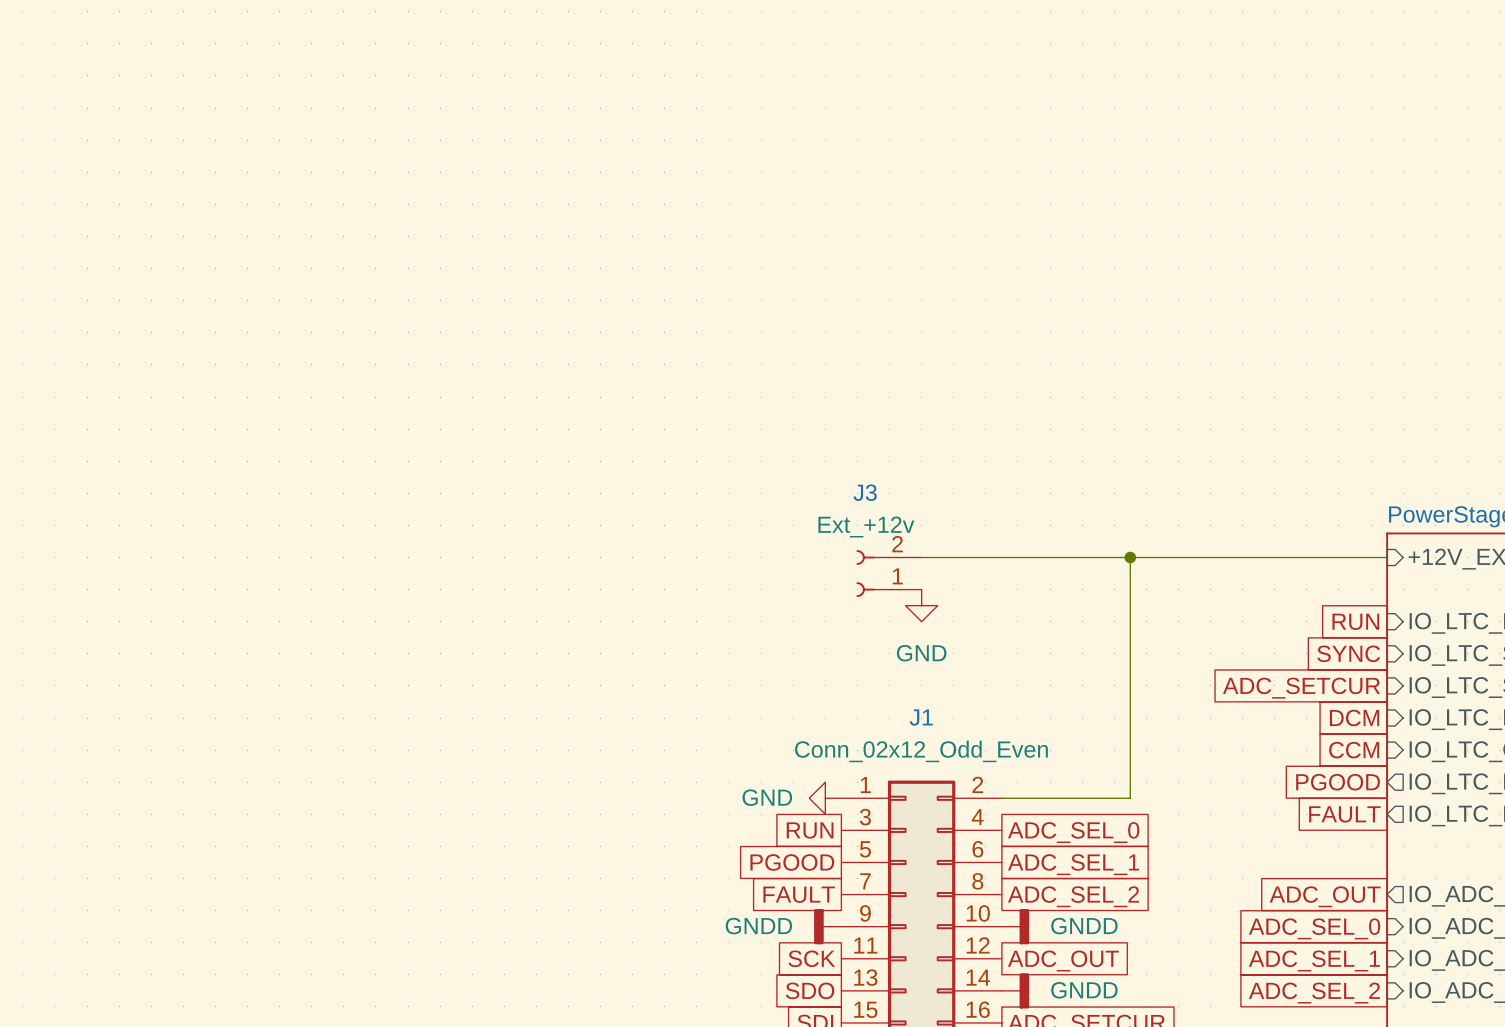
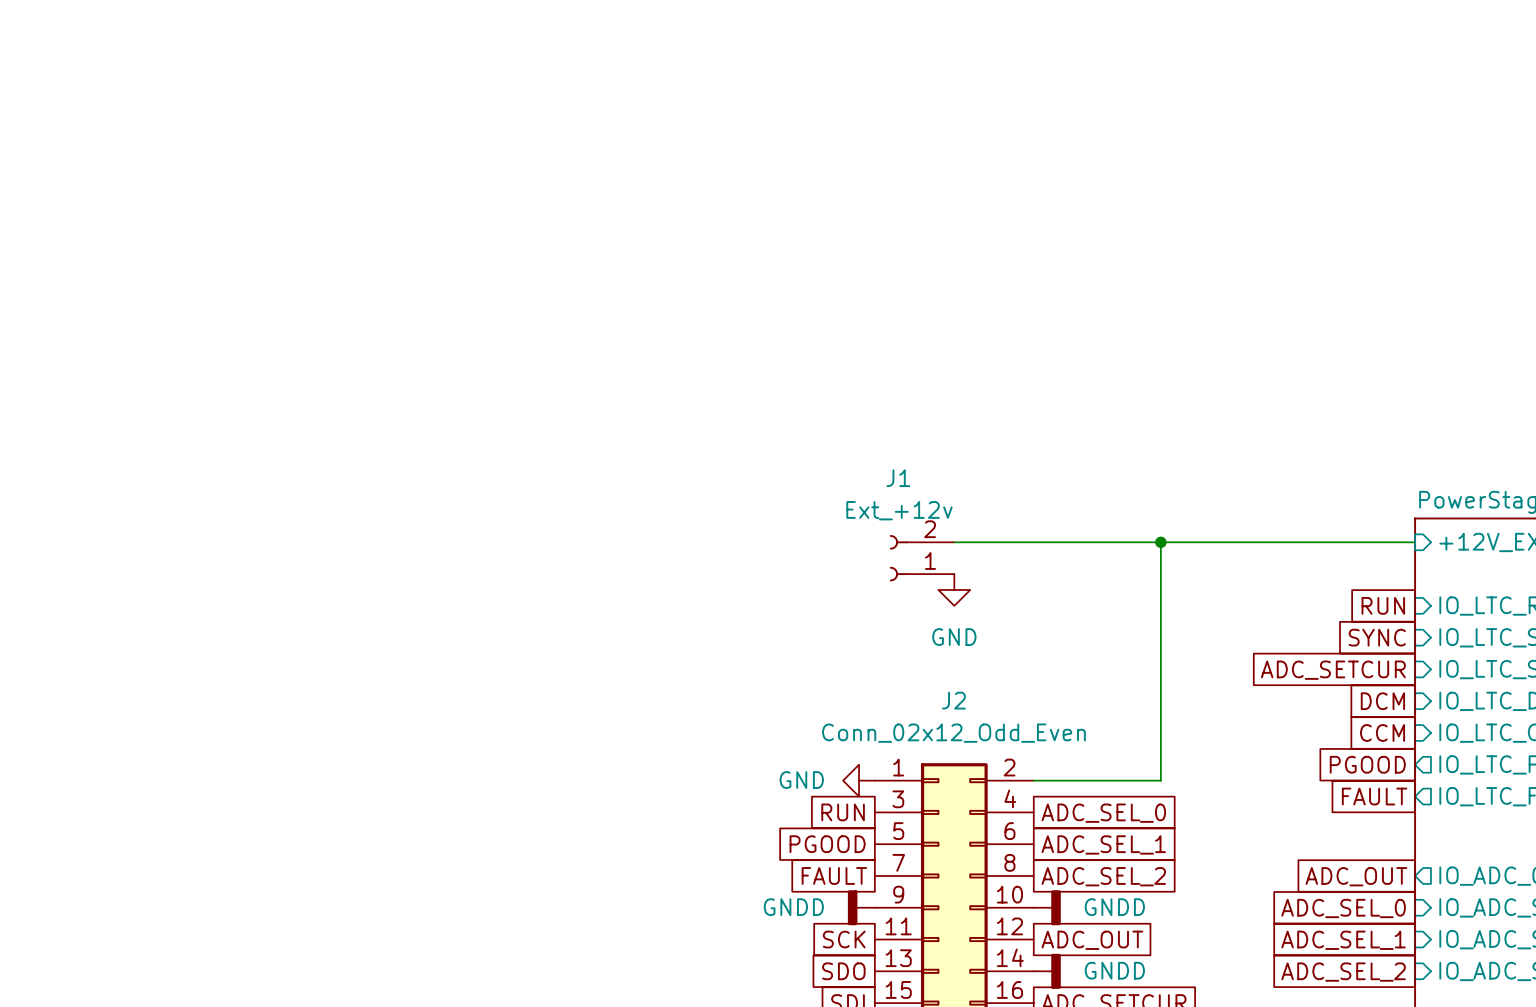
J3 name: J3 (865, 492) -> J1 (898, 478)
J1 name: J1 (921, 717) -> J2 (953, 700)

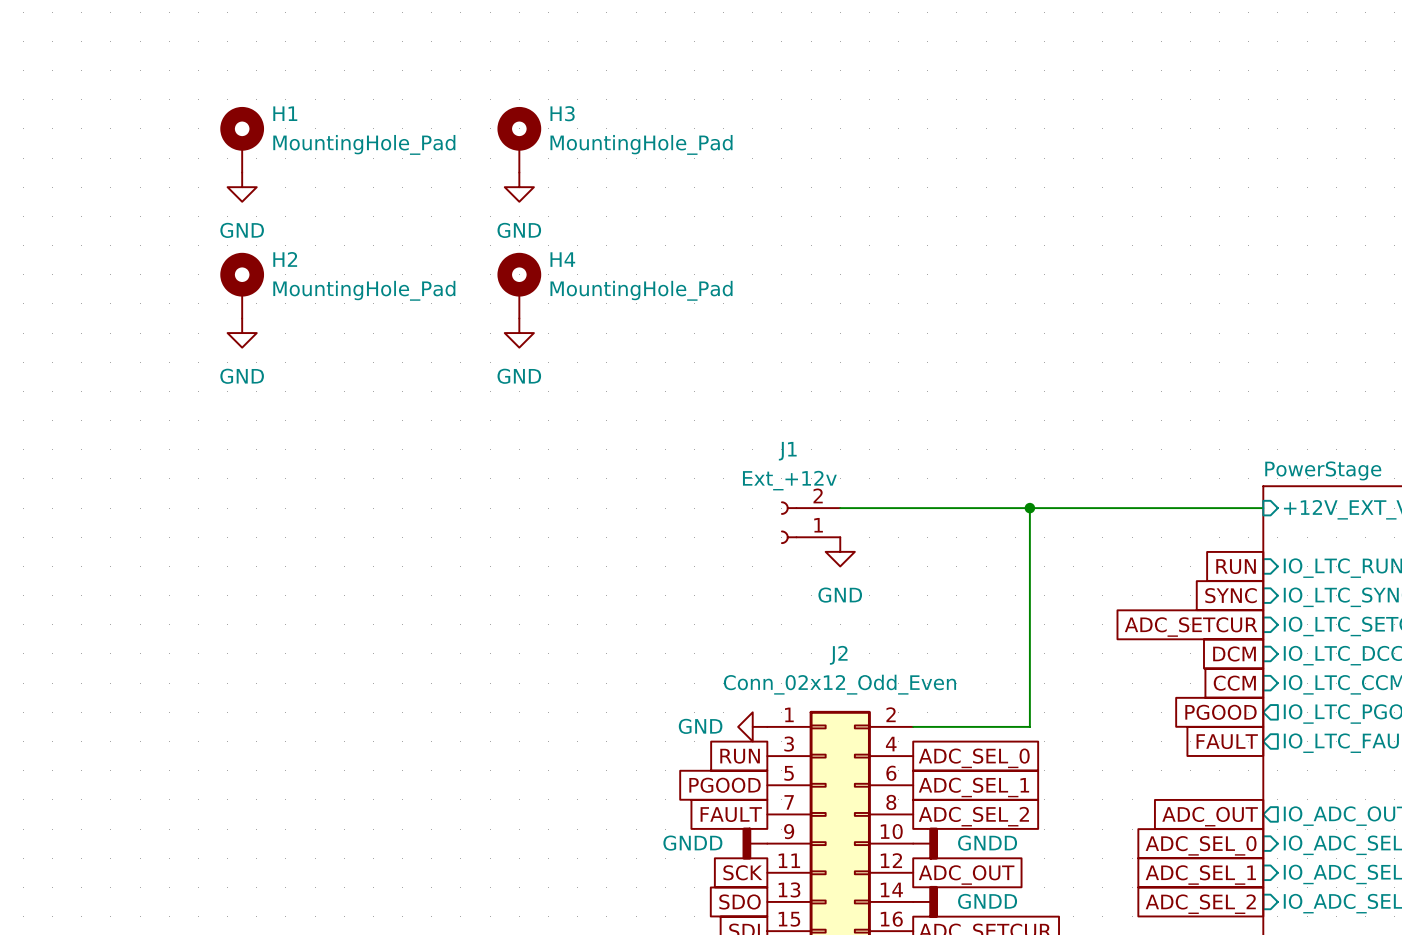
H1: none -> MountingHole_Pad (242, 139)
H3: none -> MountingHole_Pad (519, 139)
power symbol: none -> GND (242, 187)
power symbol: none -> GND (519, 187)
H2: none -> MountingHole_Pad (242, 285)
H4: none -> MountingHole_Pad (519, 285)
power symbol: none -> GND (242, 333)
power symbol: none -> GND (519, 333)

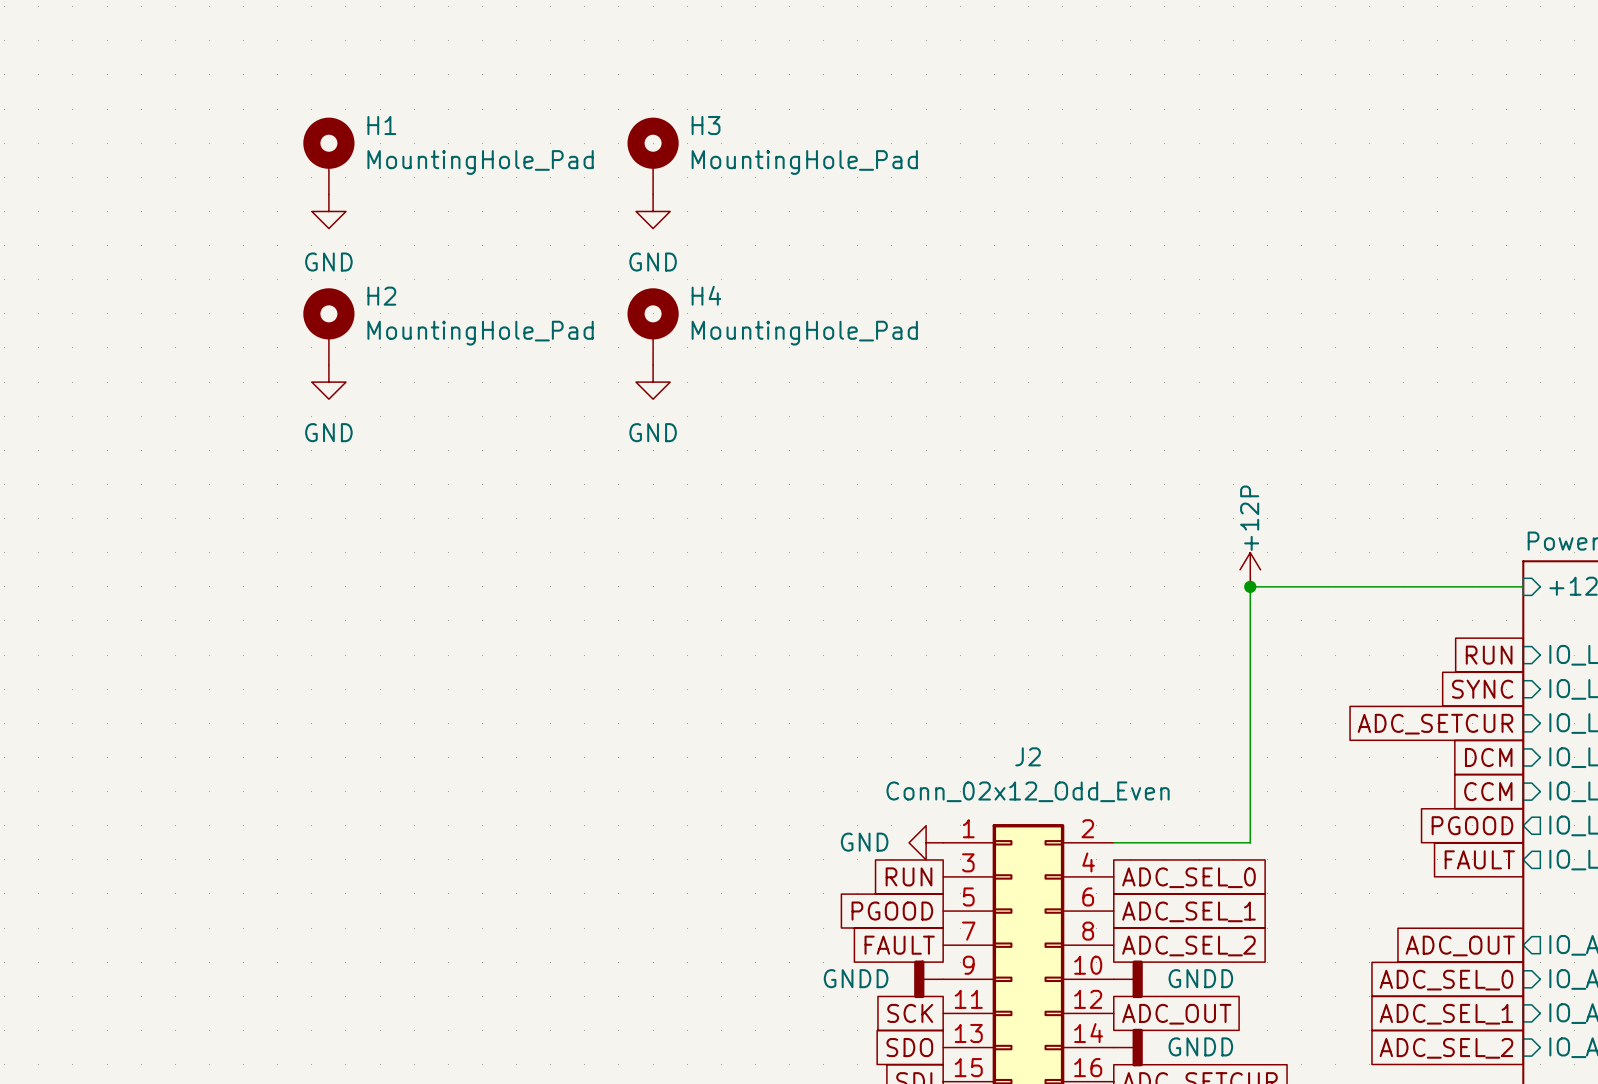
power symbol: none -> +12P (1250, 569)
wire: (840, 508) (1029, 508) -> none
J1: Ext_+12v (810, 522) -> none
power symbol: GND (840, 551) -> none

